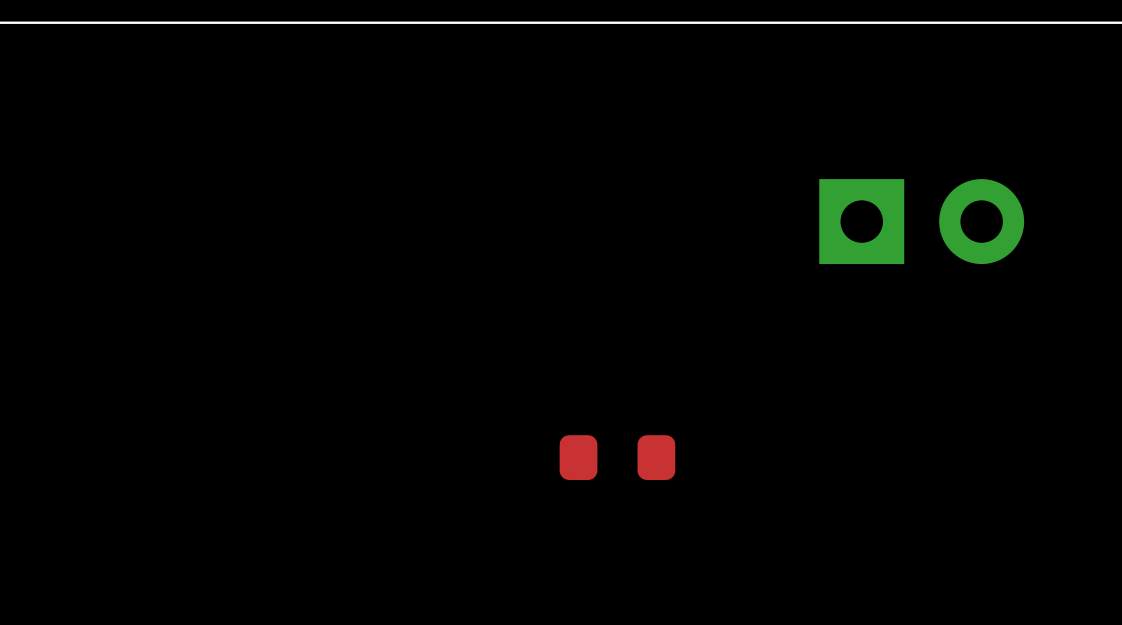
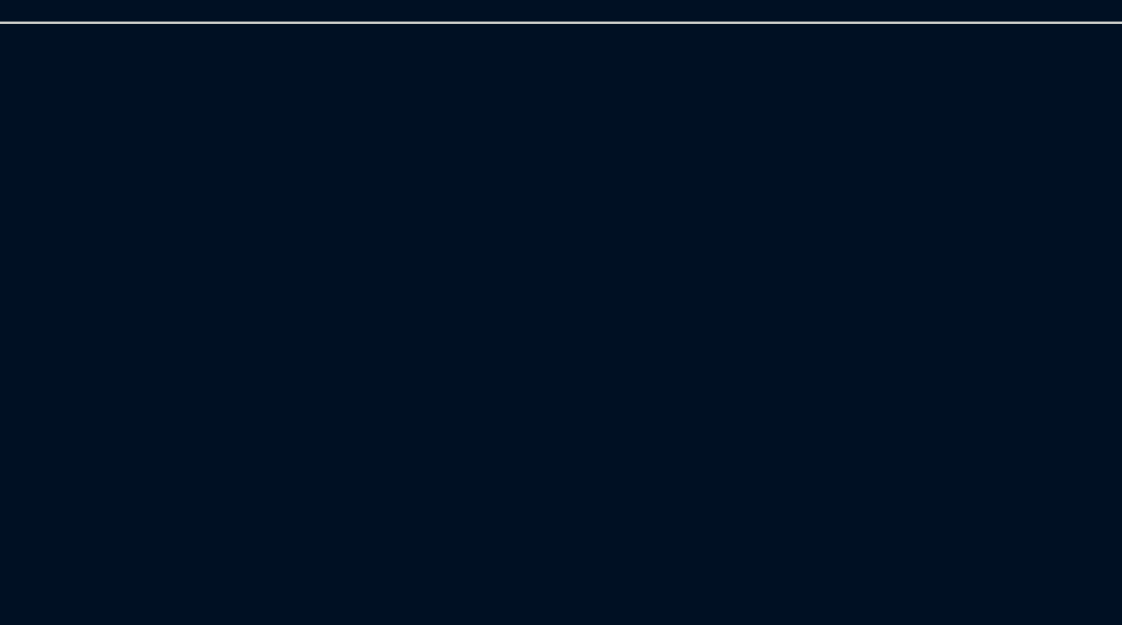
part: (921, 221) -> none
part: (617, 457) -> none

